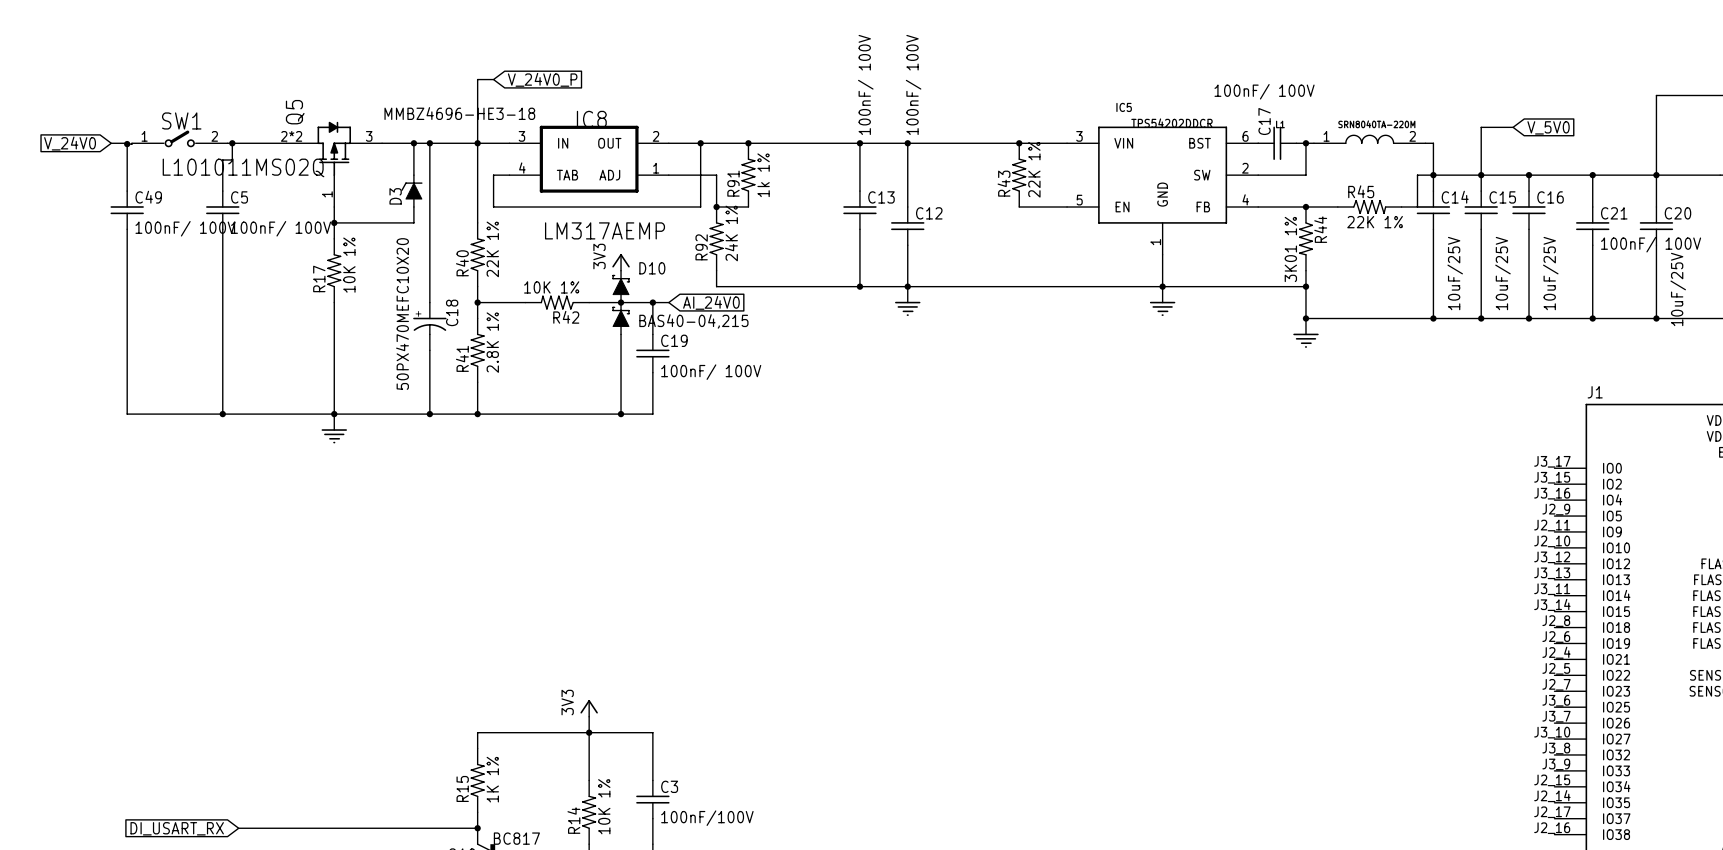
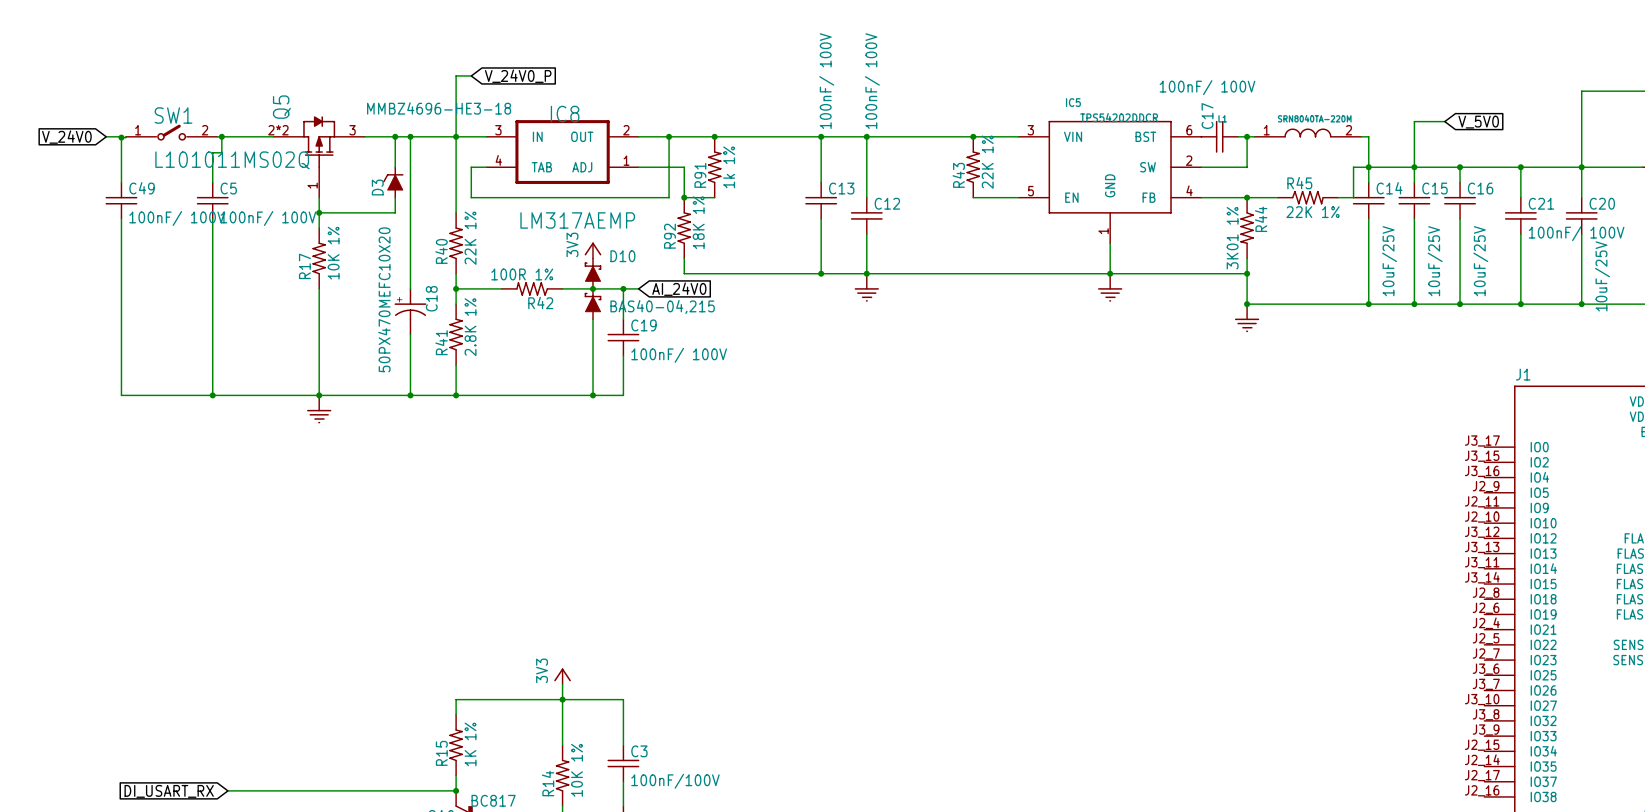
R92 value: 24K 1% (731, 233) -> 18K 1% (698, 222)
R42 value: 10K 1% (551, 287) -> 100R 1% (522, 274)

